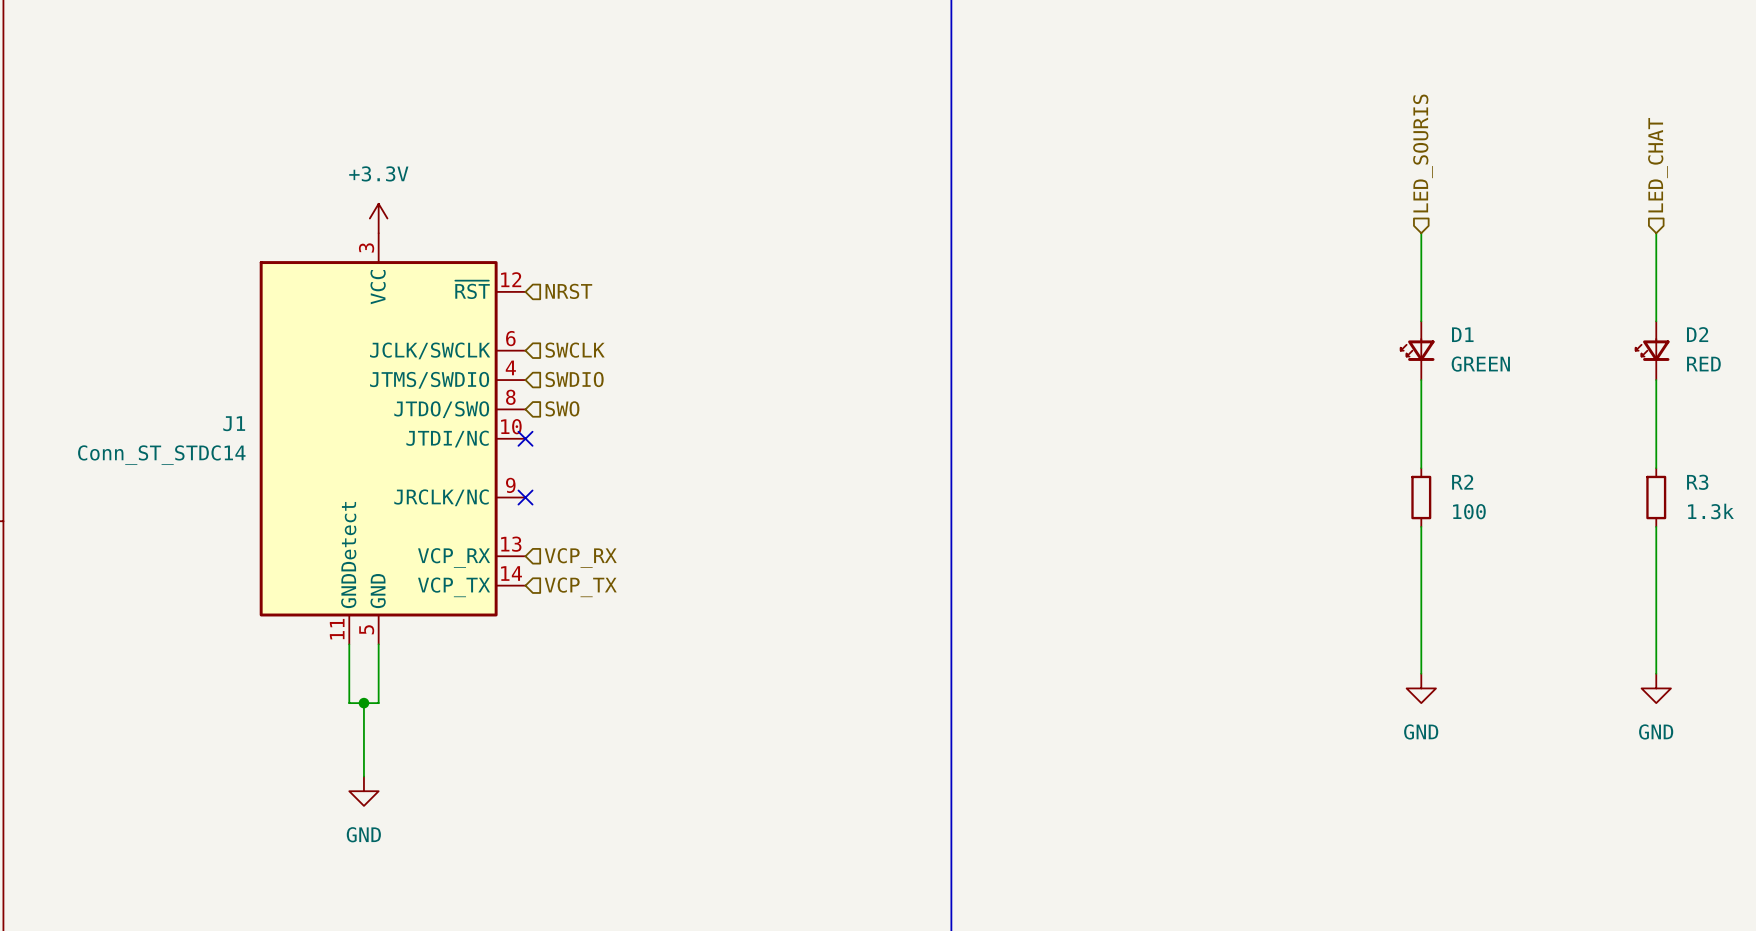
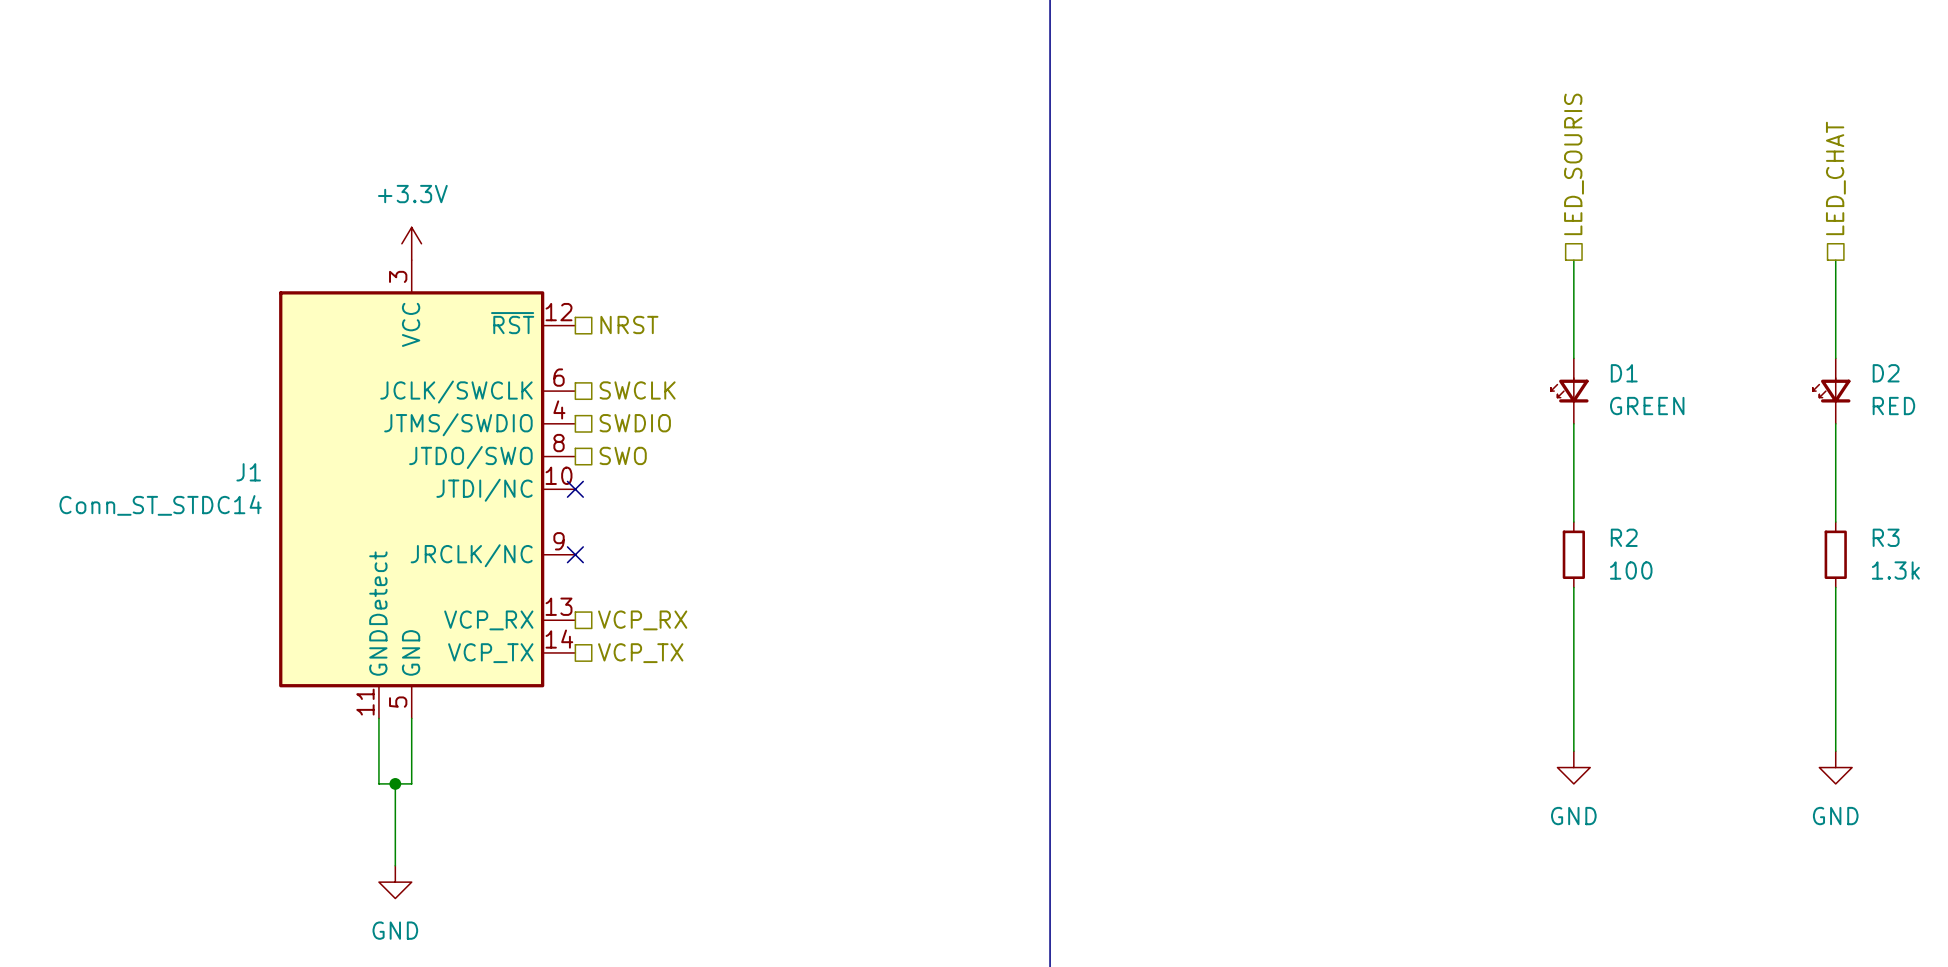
hierarchical label shape: input (1423, 153) -> passive (1574, 164)
hierarchical label shape: input (1657, 165) -> passive (1835, 178)
hierarchical label shape: input (568, 291) -> passive (629, 325)
hierarchical label shape: input (575, 350) -> passive (637, 390)
hierarchical label shape: input (574, 379) -> passive (635, 423)
hierarchical label shape: input (562, 408) -> passive (623, 455)
hierarchical label shape: input (580, 557) -> passive (642, 620)
hierarchical label shape: input (580, 587) -> passive (640, 653)

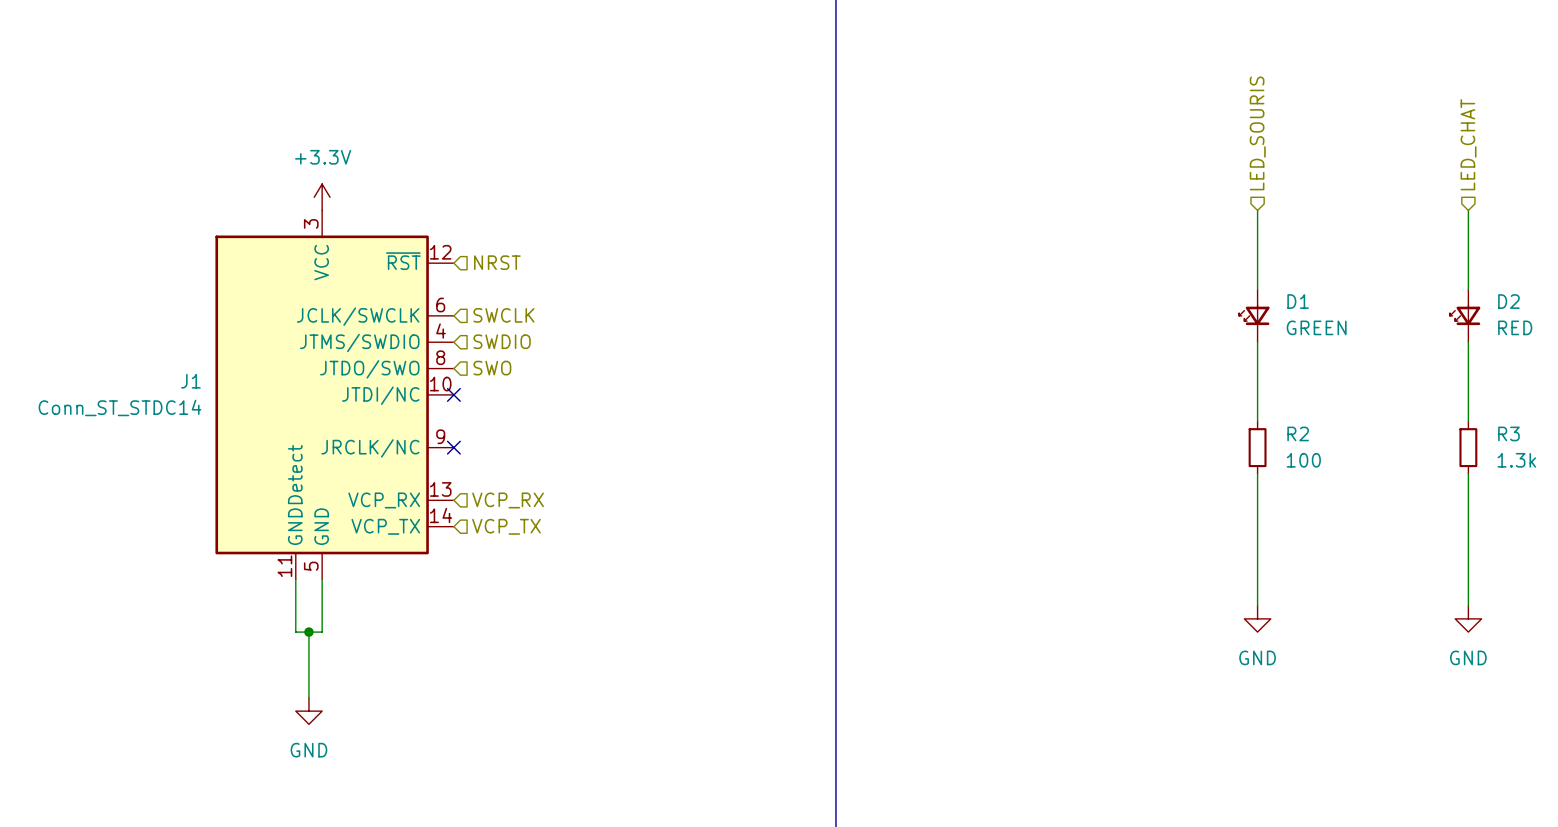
hierarchical label shape: passive (1574, 164) -> input (1257, 133)
hierarchical label shape: passive (1835, 178) -> input (1468, 144)
hierarchical label shape: passive (629, 325) -> input (497, 262)
hierarchical label shape: passive (637, 390) -> input (503, 315)
hierarchical label shape: passive (635, 423) -> input (502, 341)
hierarchical label shape: passive (623, 455) -> input (492, 368)
hierarchical label shape: passive (642, 620) -> input (508, 500)
hierarchical label shape: passive (640, 653) -> input (506, 526)

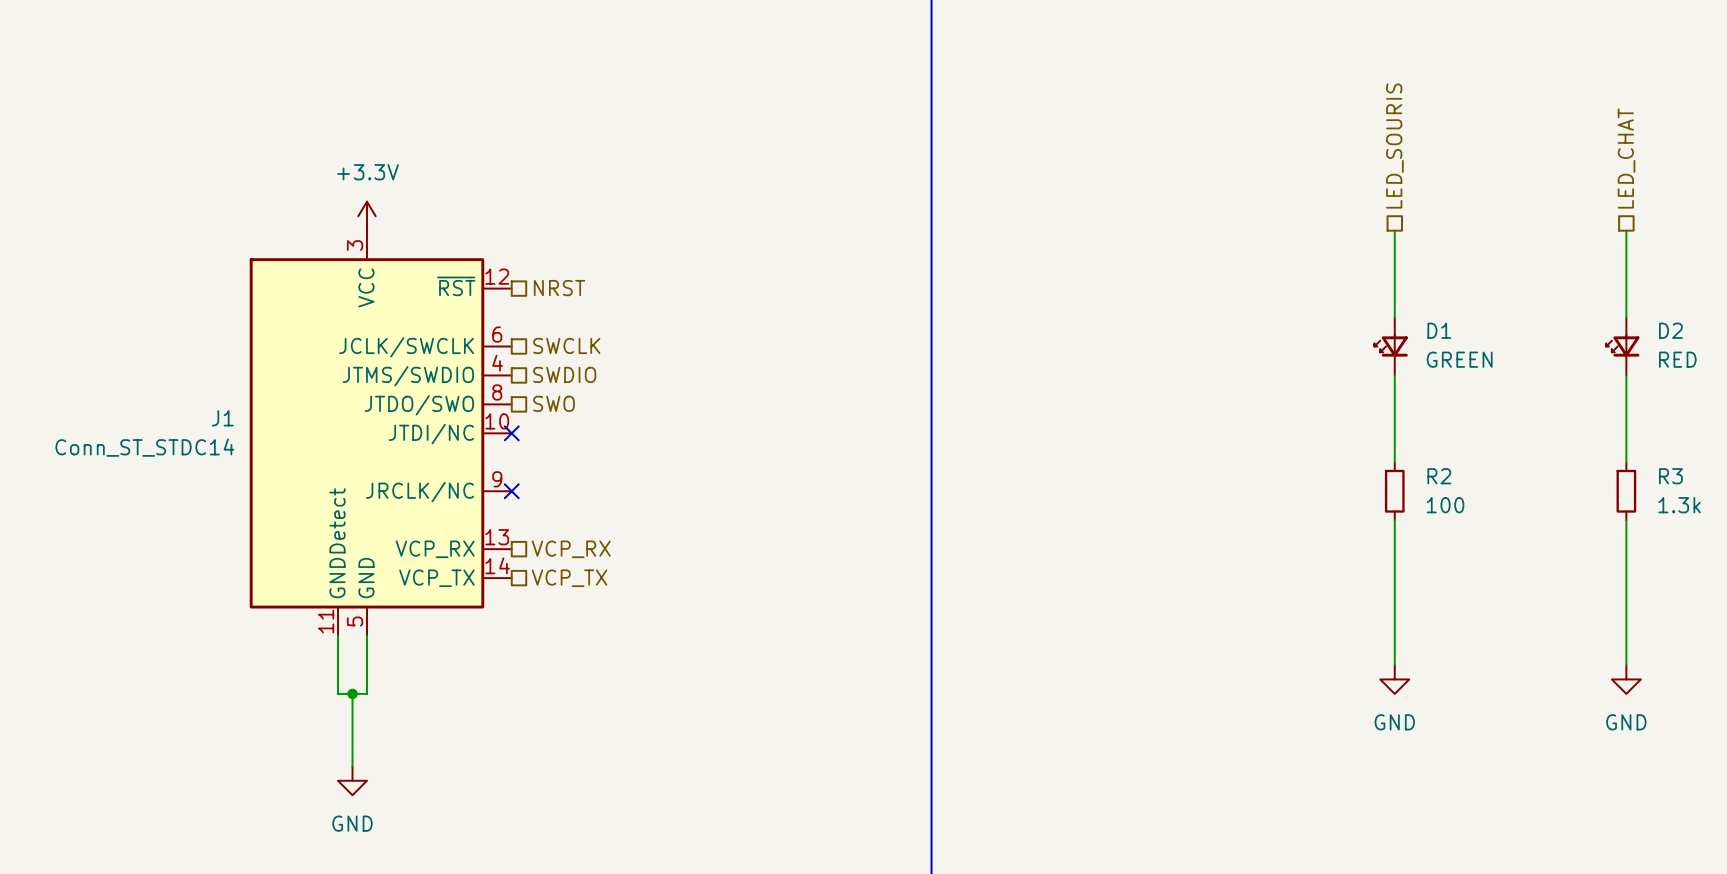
hierarchical label shape: input (1257, 133) -> passive (1394, 146)
hierarchical label shape: input (1468, 144) -> passive (1626, 158)
hierarchical label shape: input (497, 262) -> passive (559, 288)
hierarchical label shape: input (503, 315) -> passive (566, 345)
hierarchical label shape: input (502, 341) -> passive (564, 374)
hierarchical label shape: input (492, 368) -> passive (554, 403)
hierarchical label shape: input (508, 500) -> passive (571, 549)
hierarchical label shape: input (506, 526) -> passive (569, 578)

